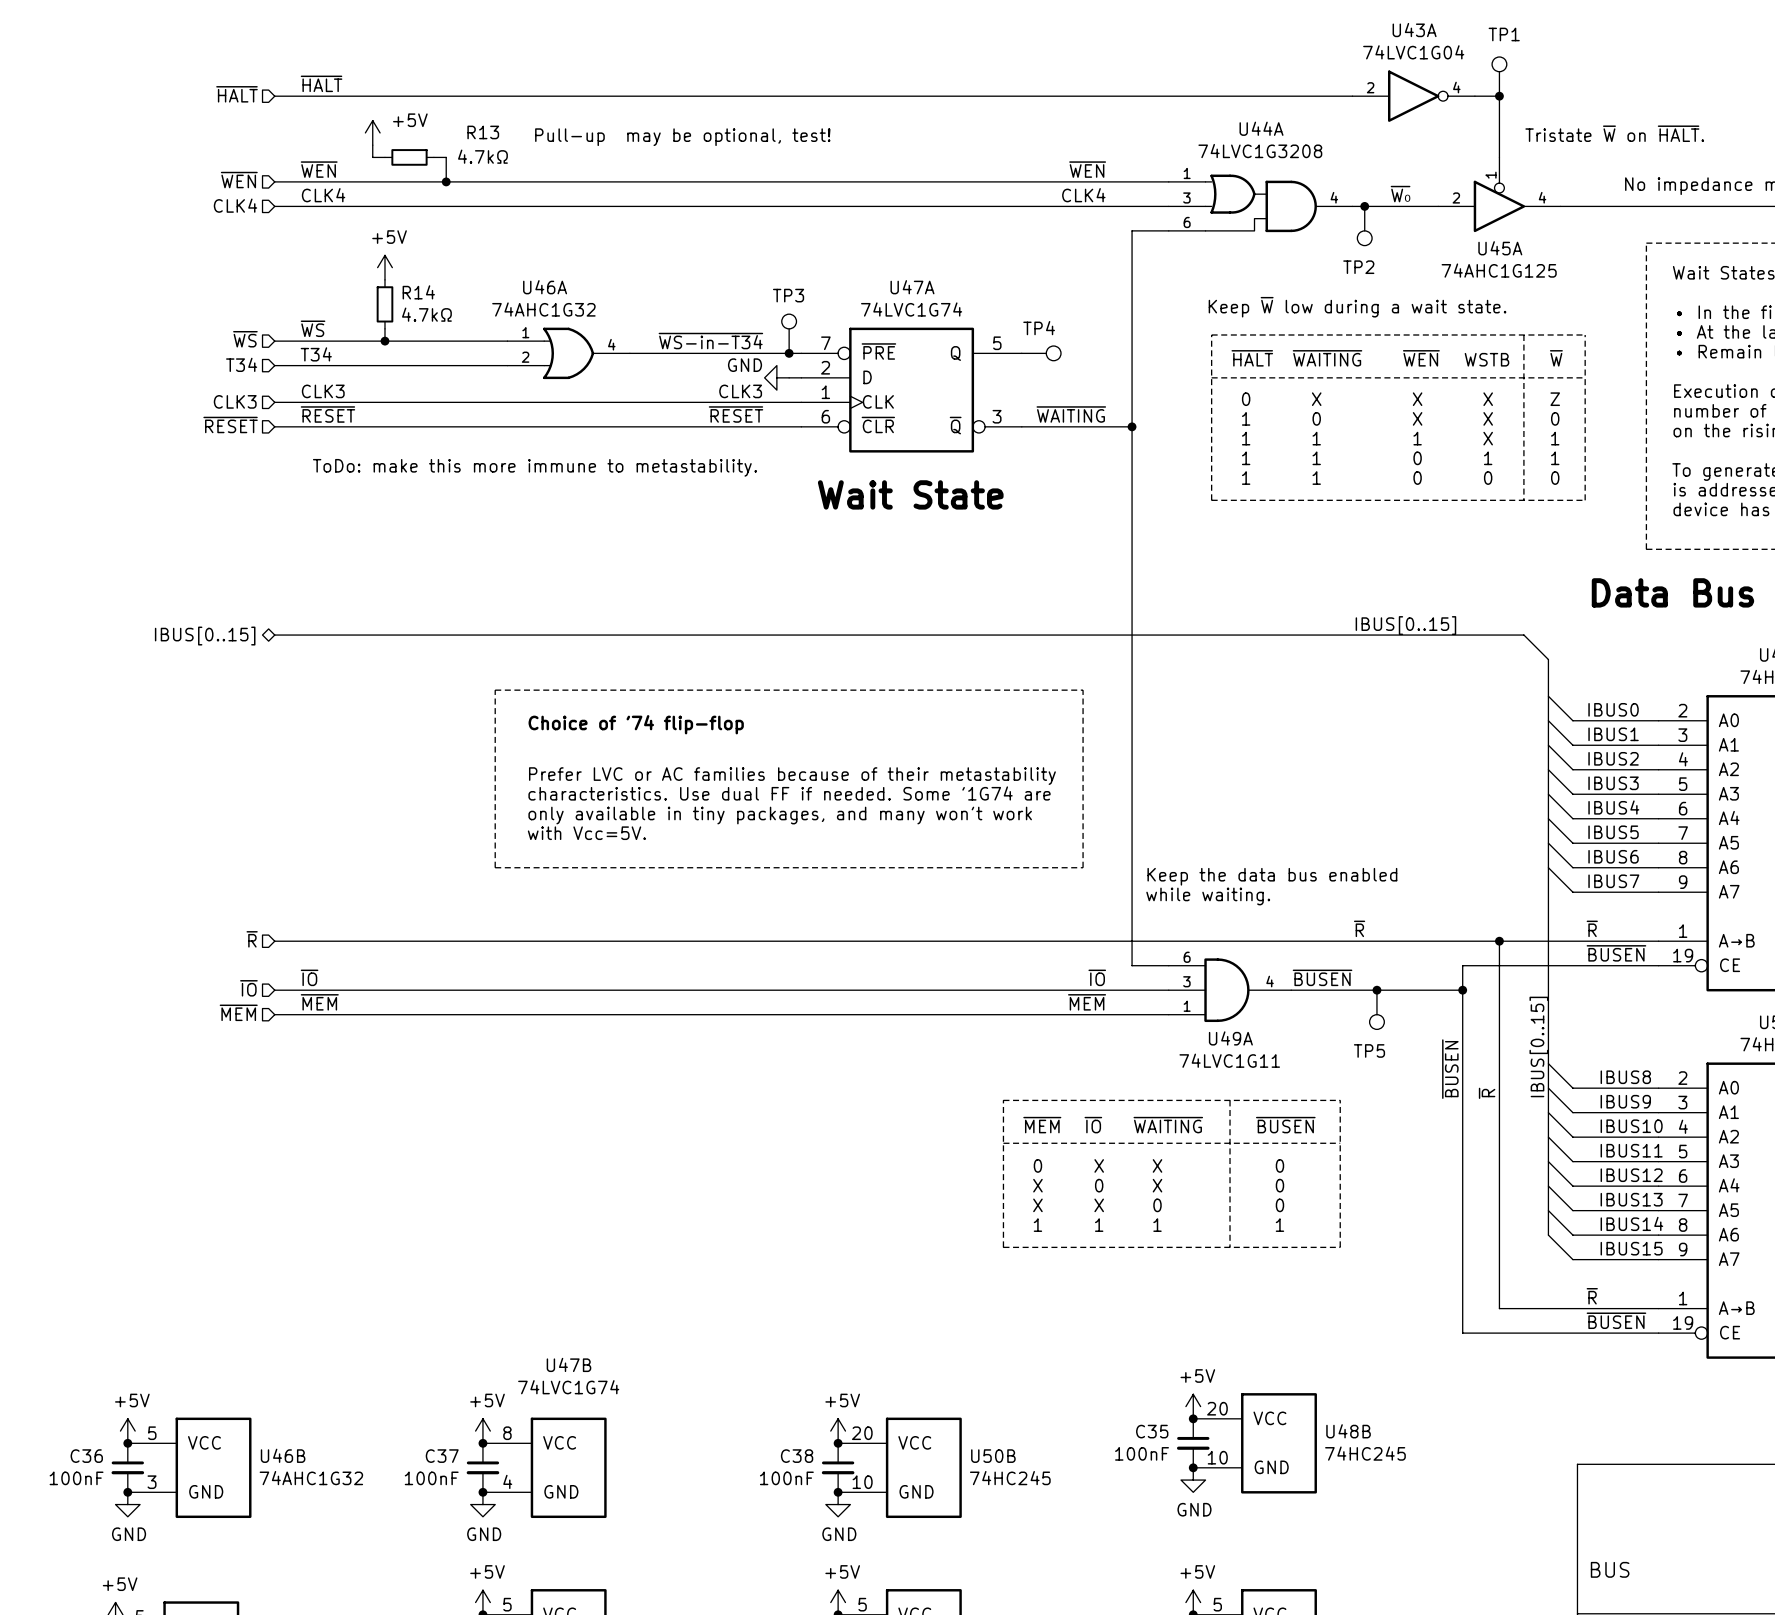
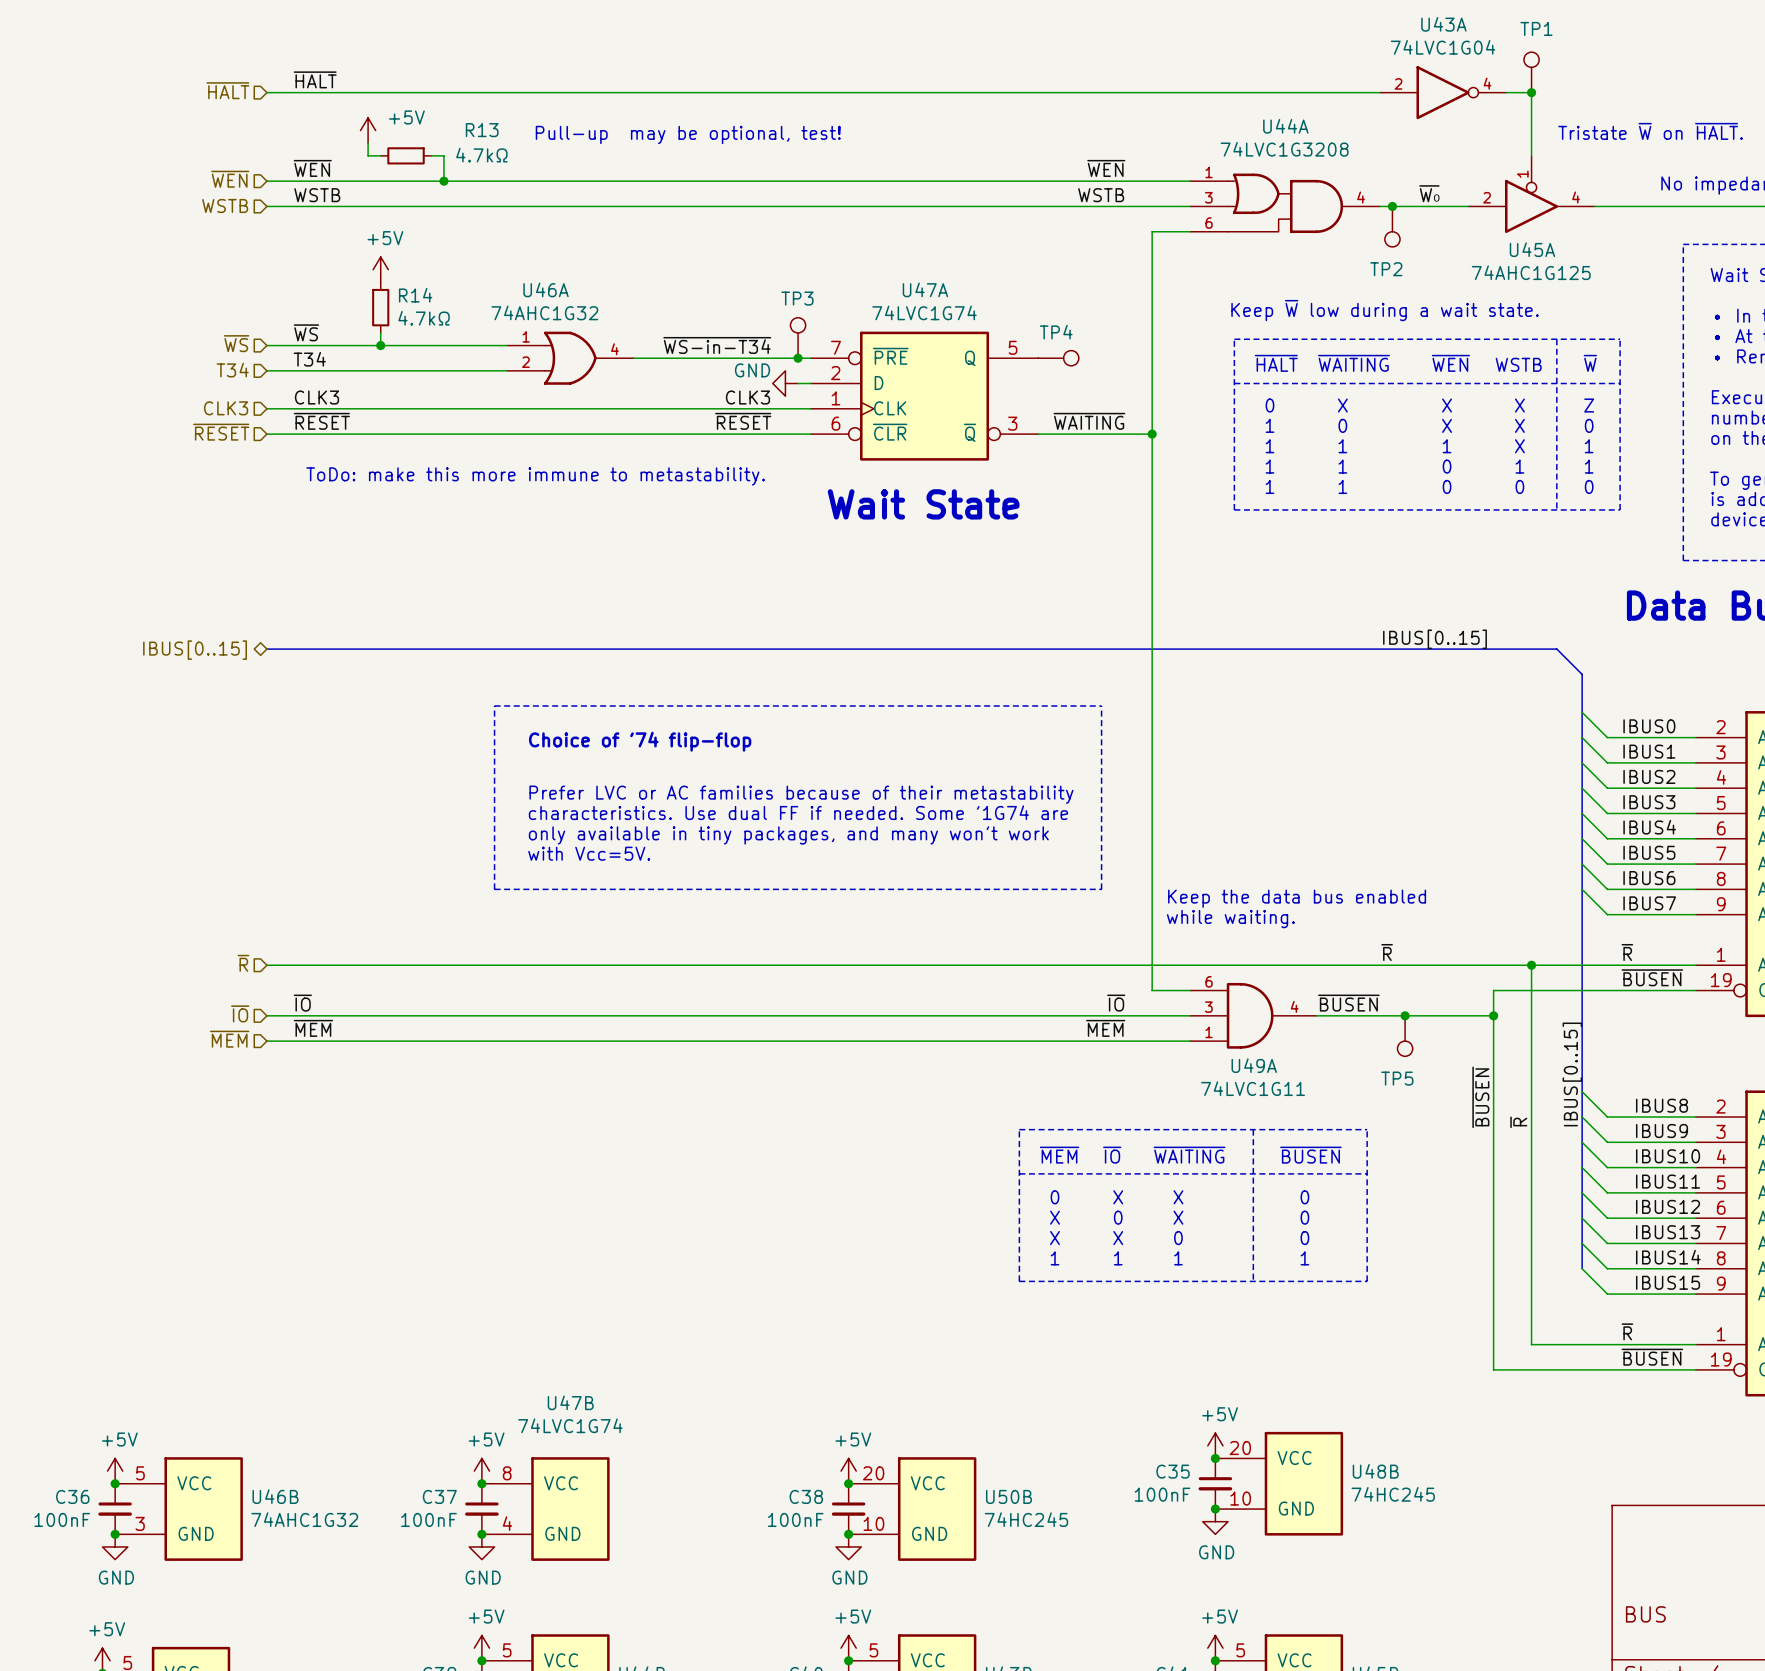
label: CLK4 (323, 195) -> WSTB (317, 195)
label: CLK4 (1083, 195) -> WSTB (1101, 195)
hierarchical label: CLK4 (235, 205) -> WSTB (225, 205)

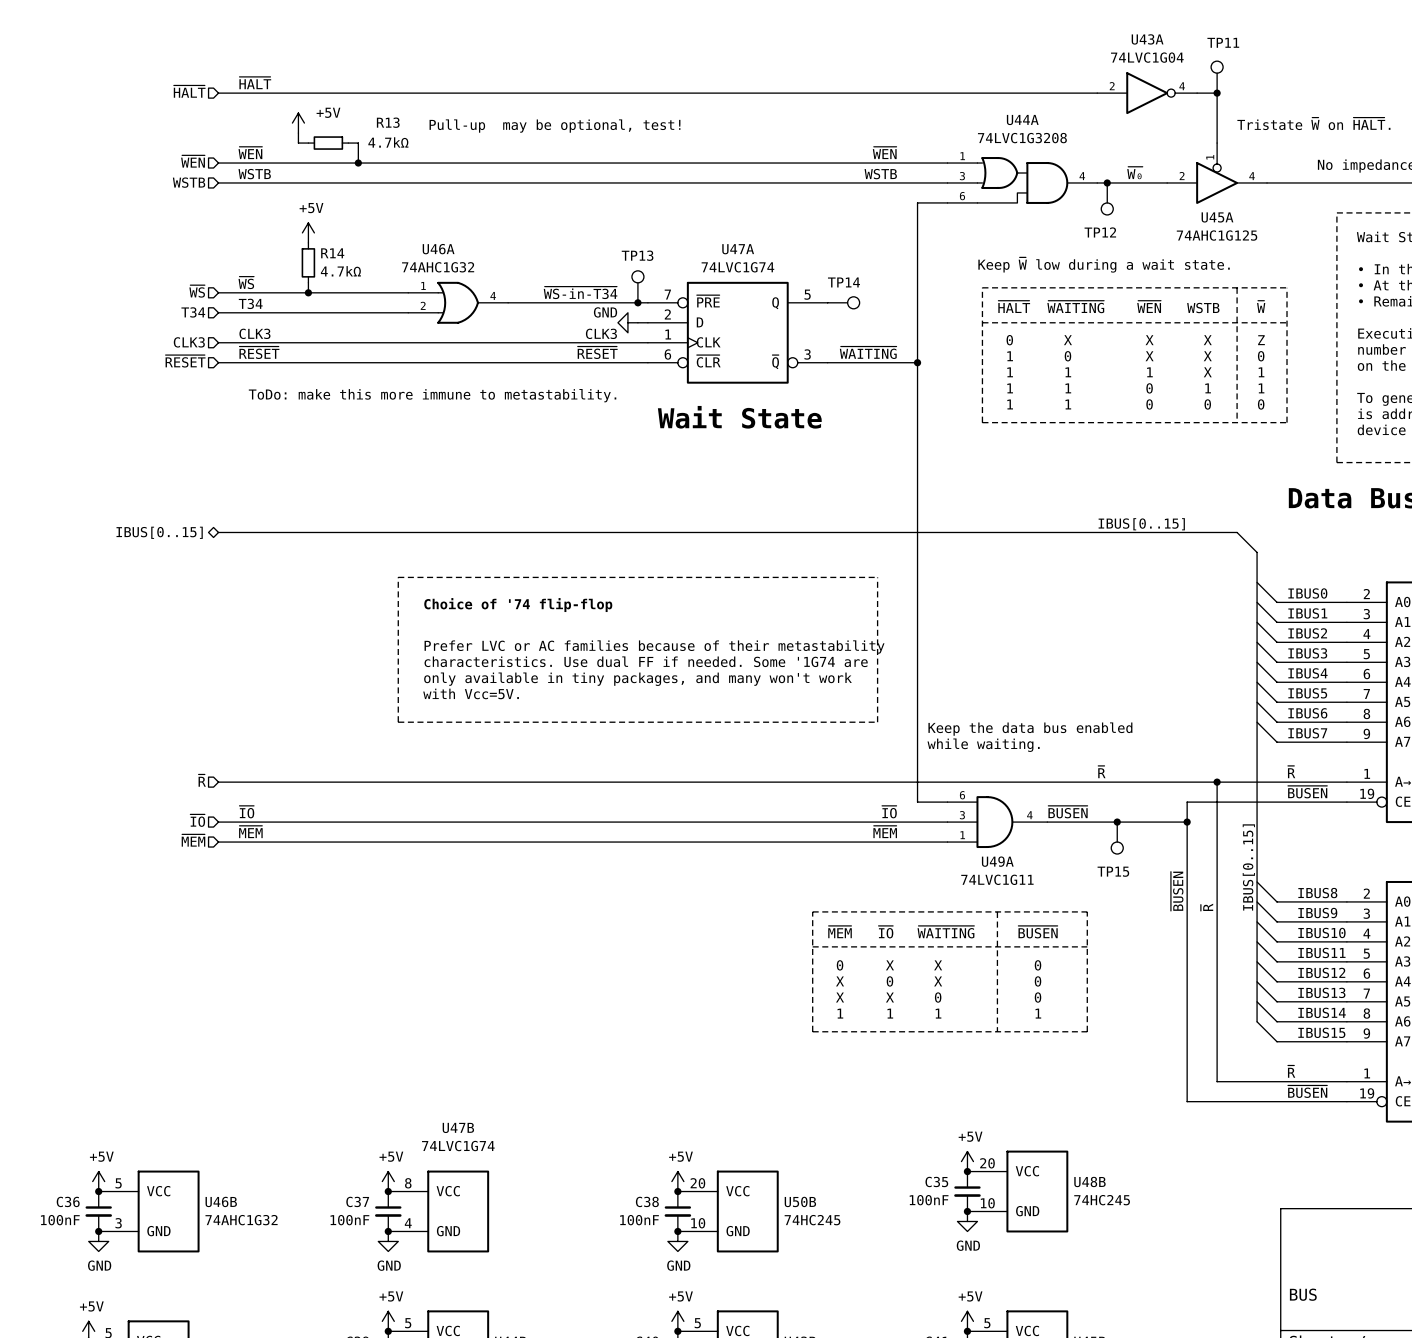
TP1 name: TP1 (1536, 28) -> TP11 (1223, 42)
TP2 name: TP2 (1386, 269) -> TP12 (1100, 232)
TP3 name: TP3 (797, 298) -> TP13 (637, 255)
TP4 name: TP4 (1056, 332) -> TP14 (843, 282)
TP5 name: TP5 (1397, 1078) -> TP15 (1113, 871)

